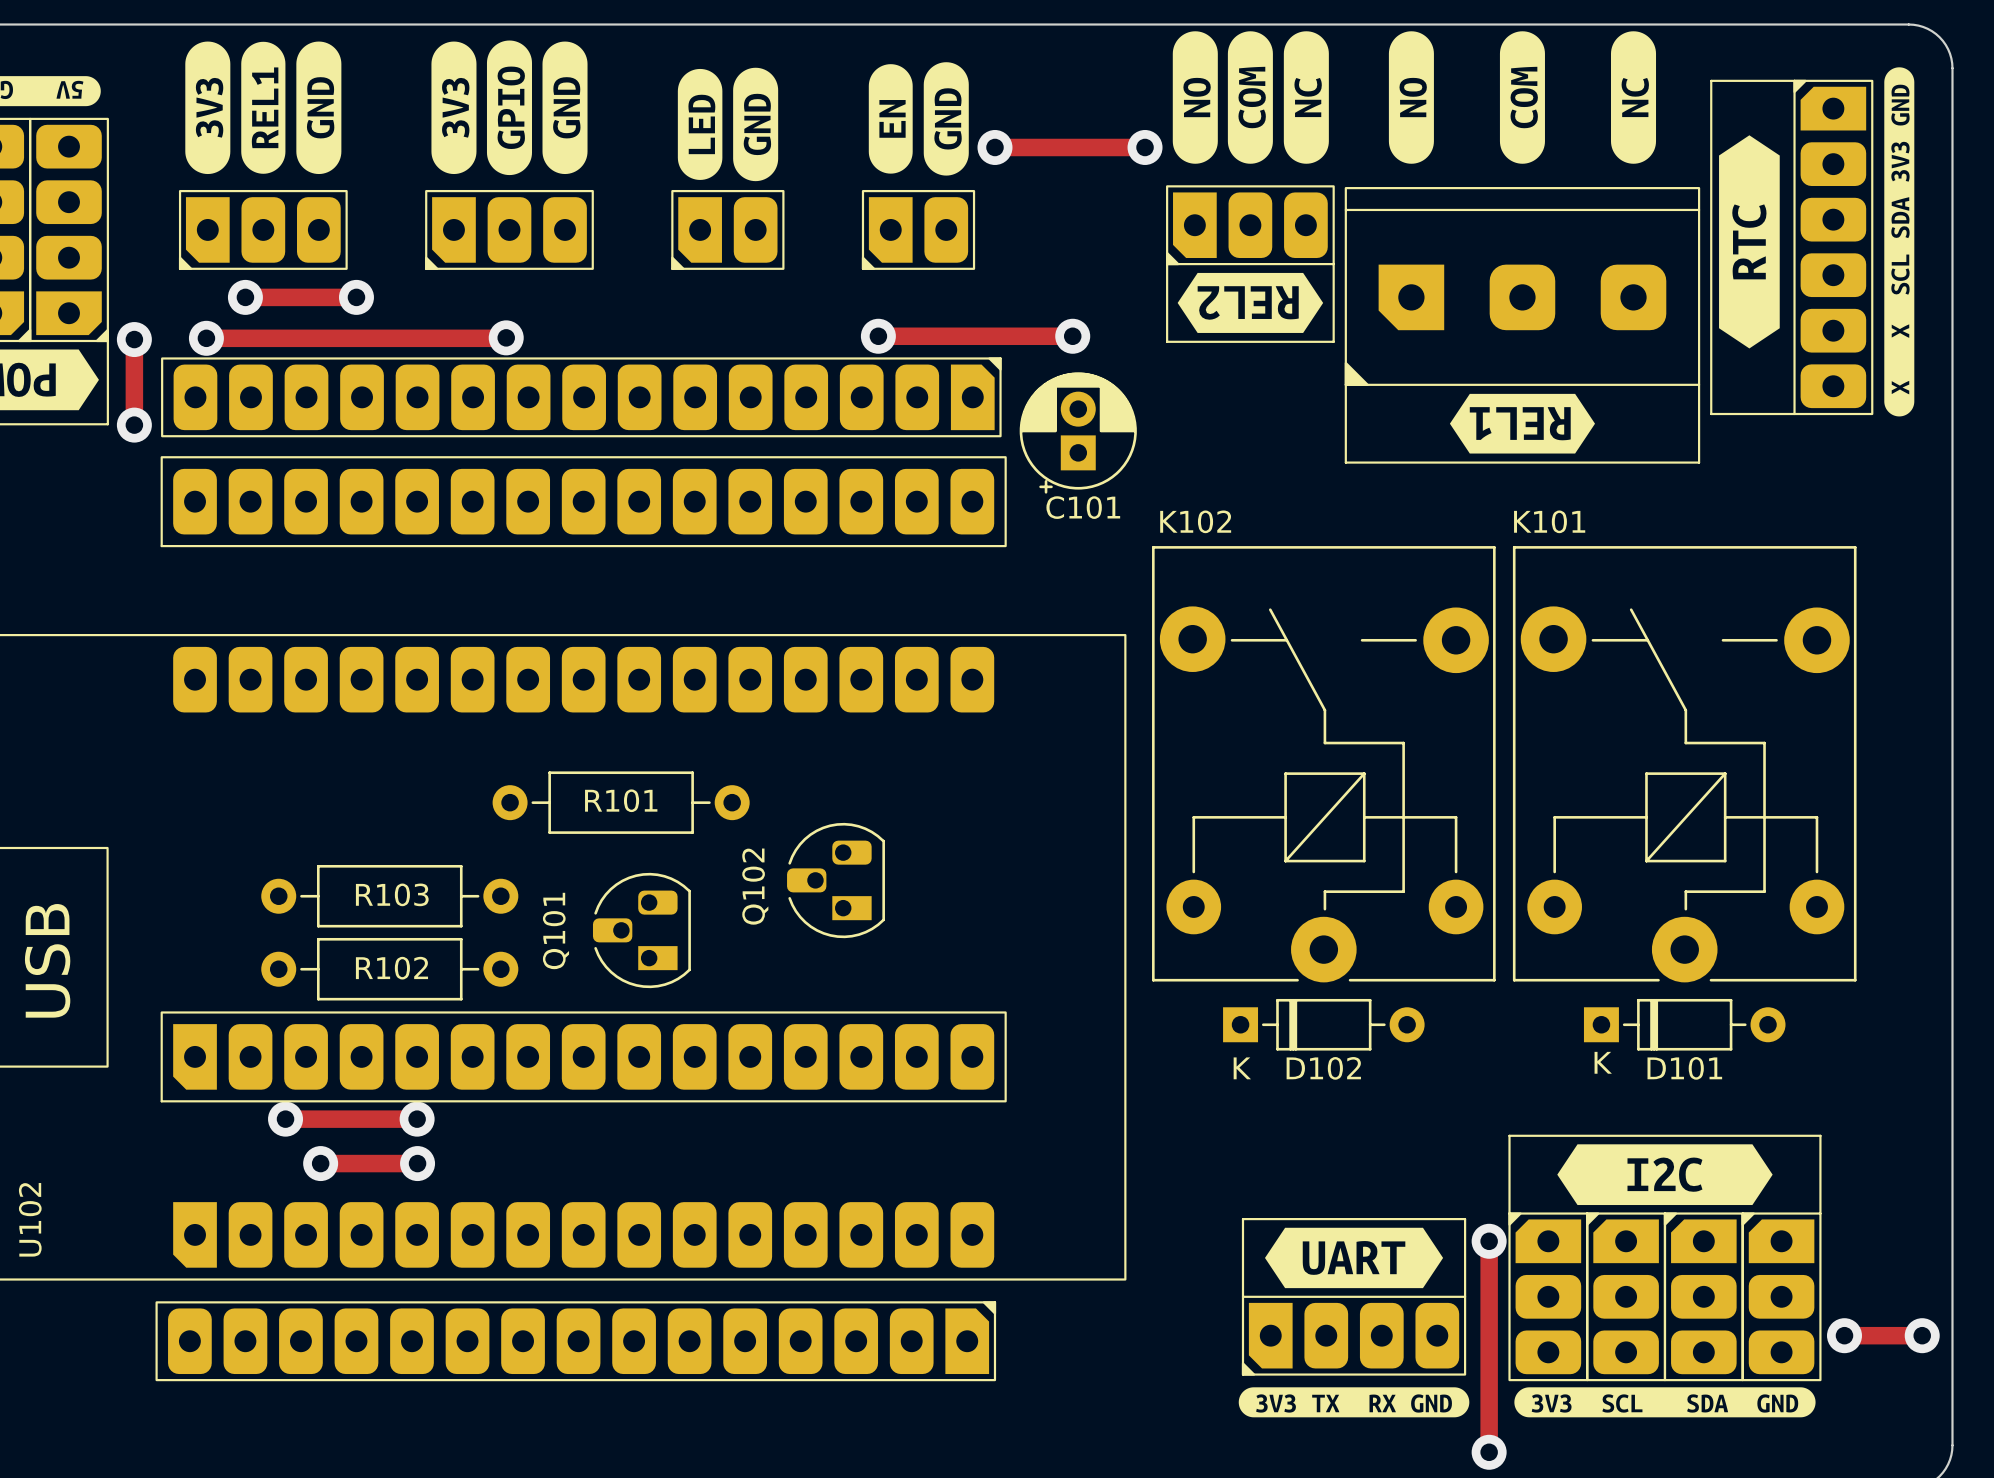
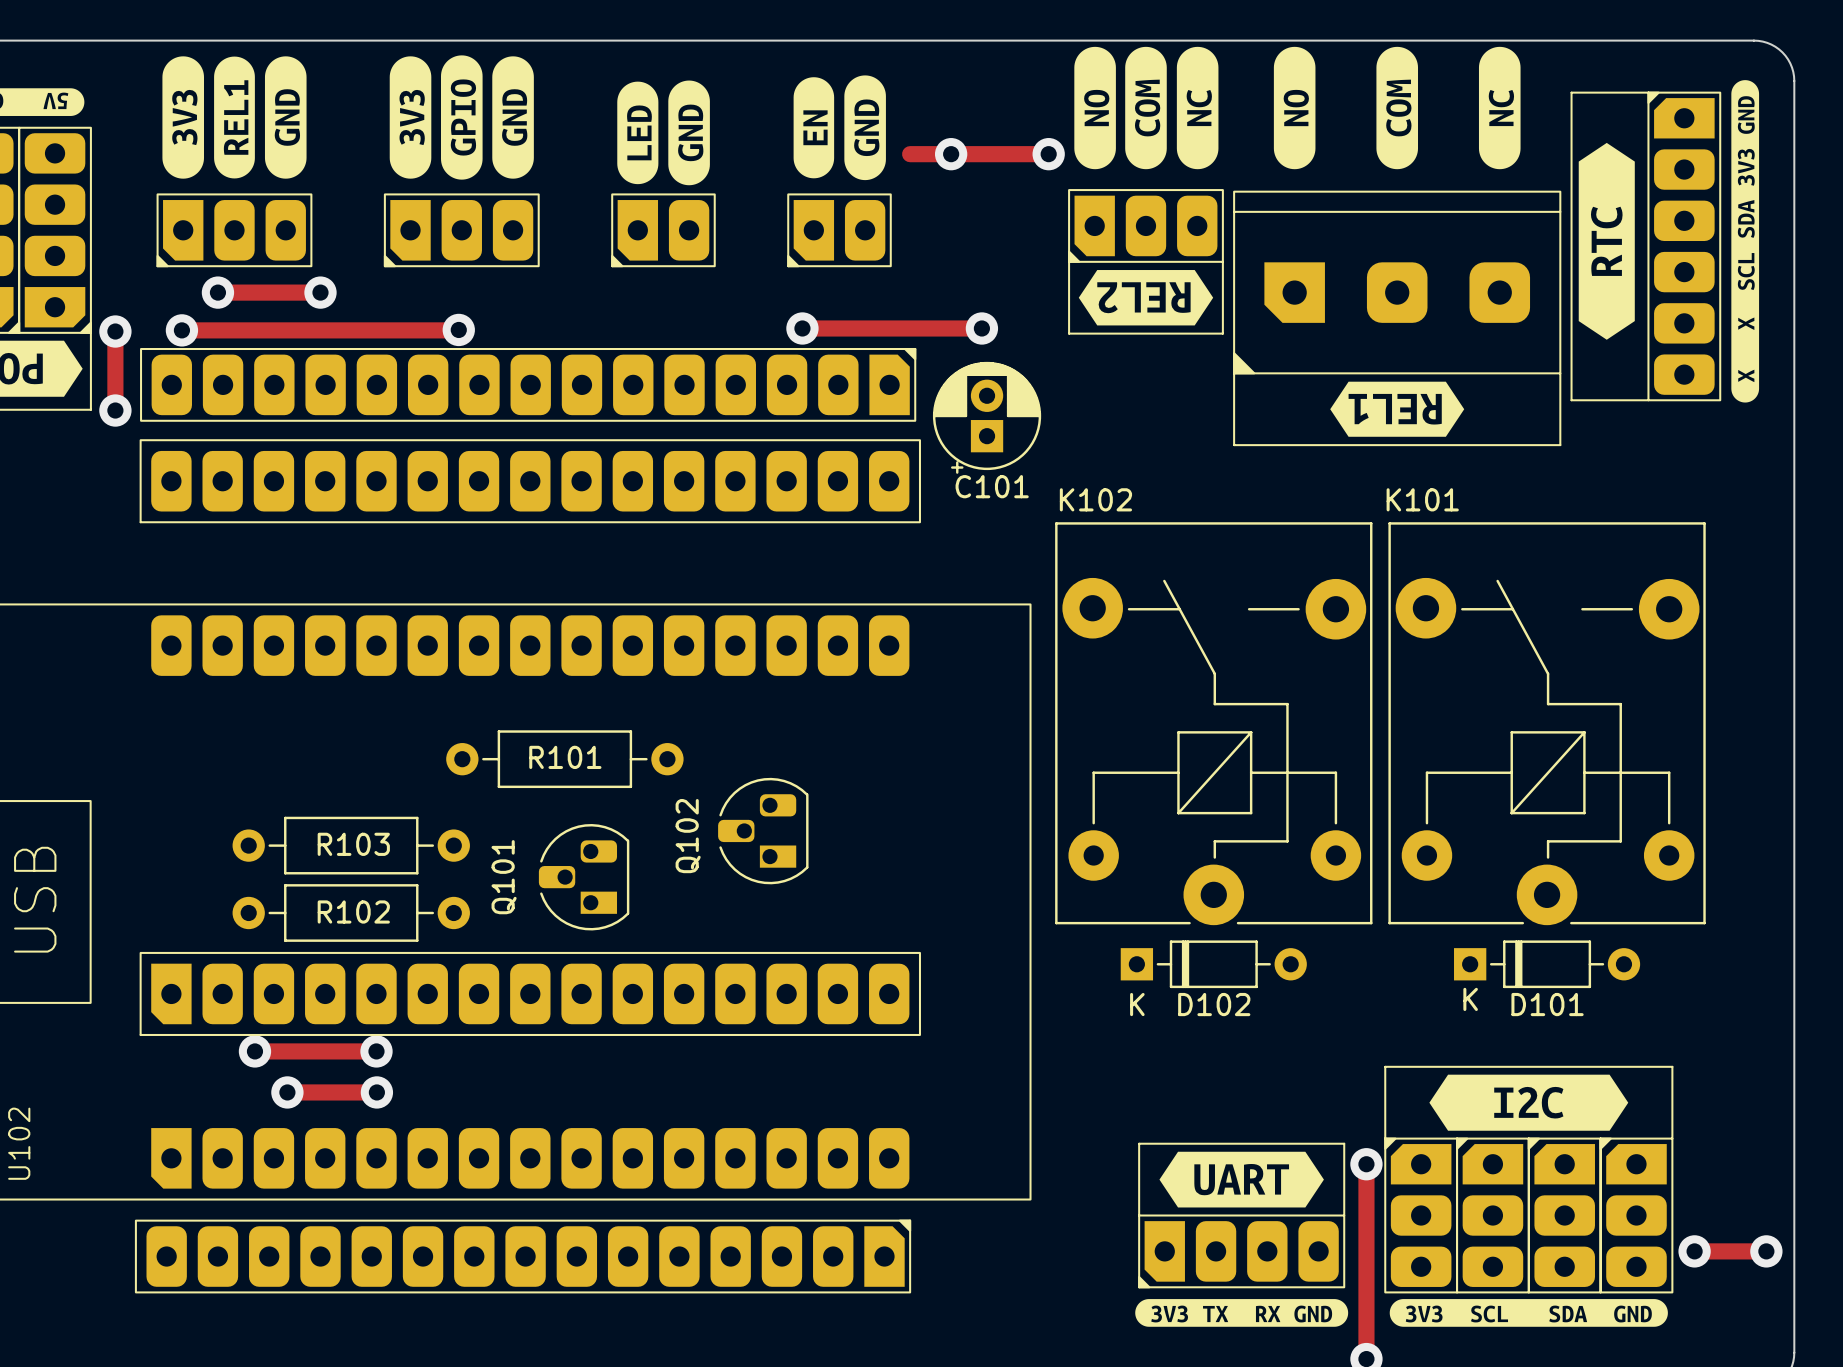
via position: (994, 147) -> (951, 154)

